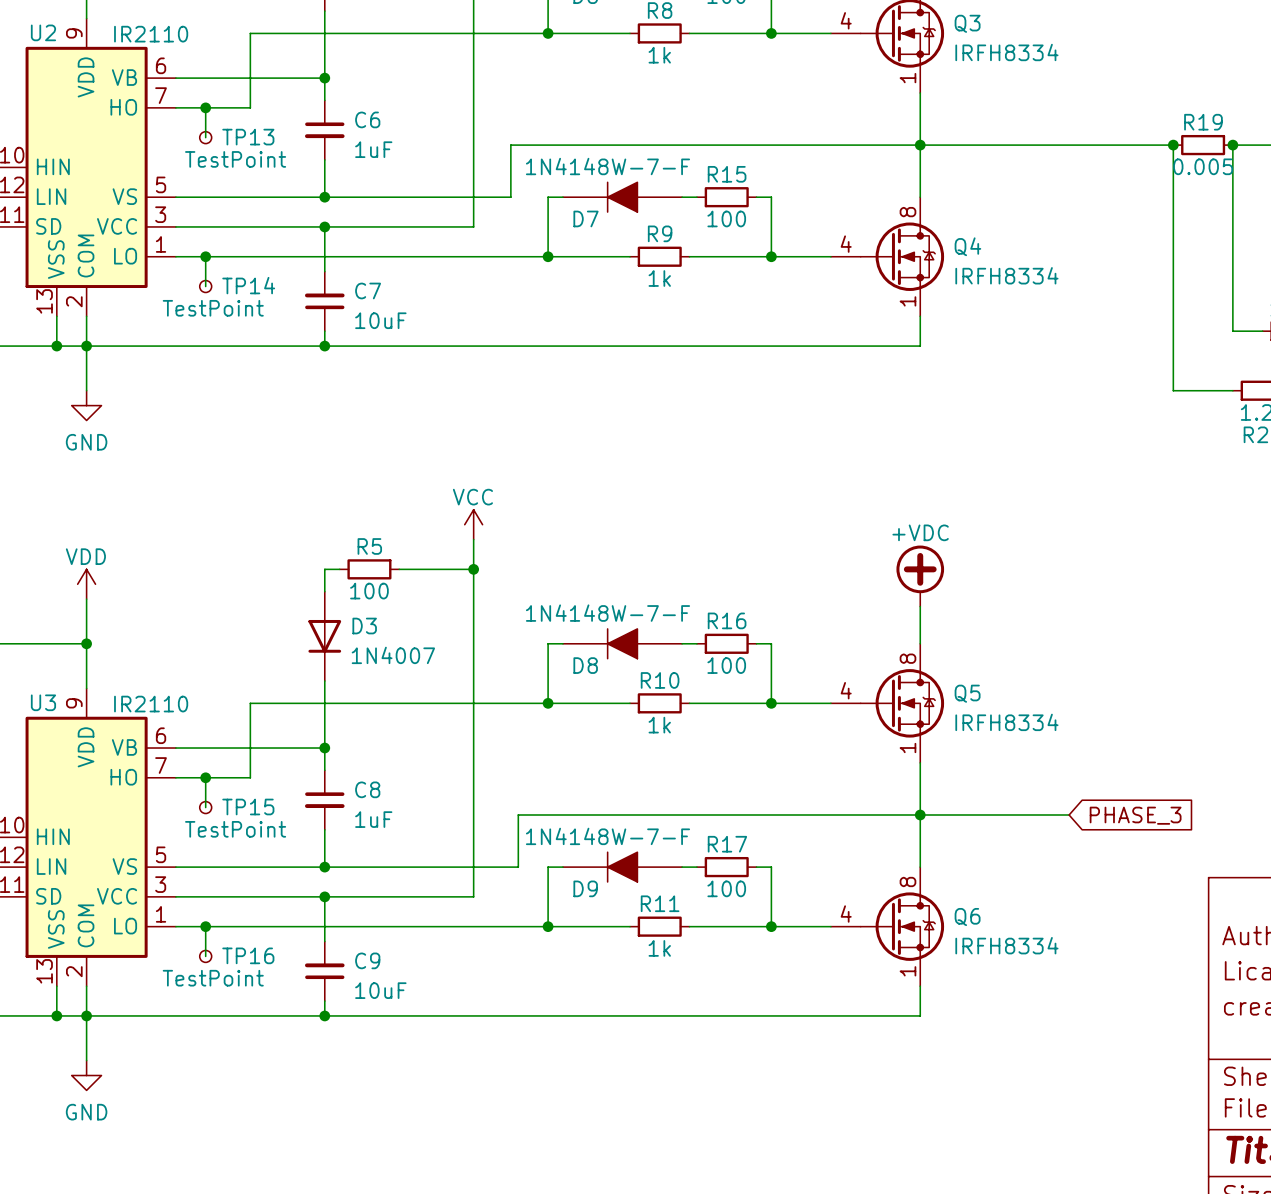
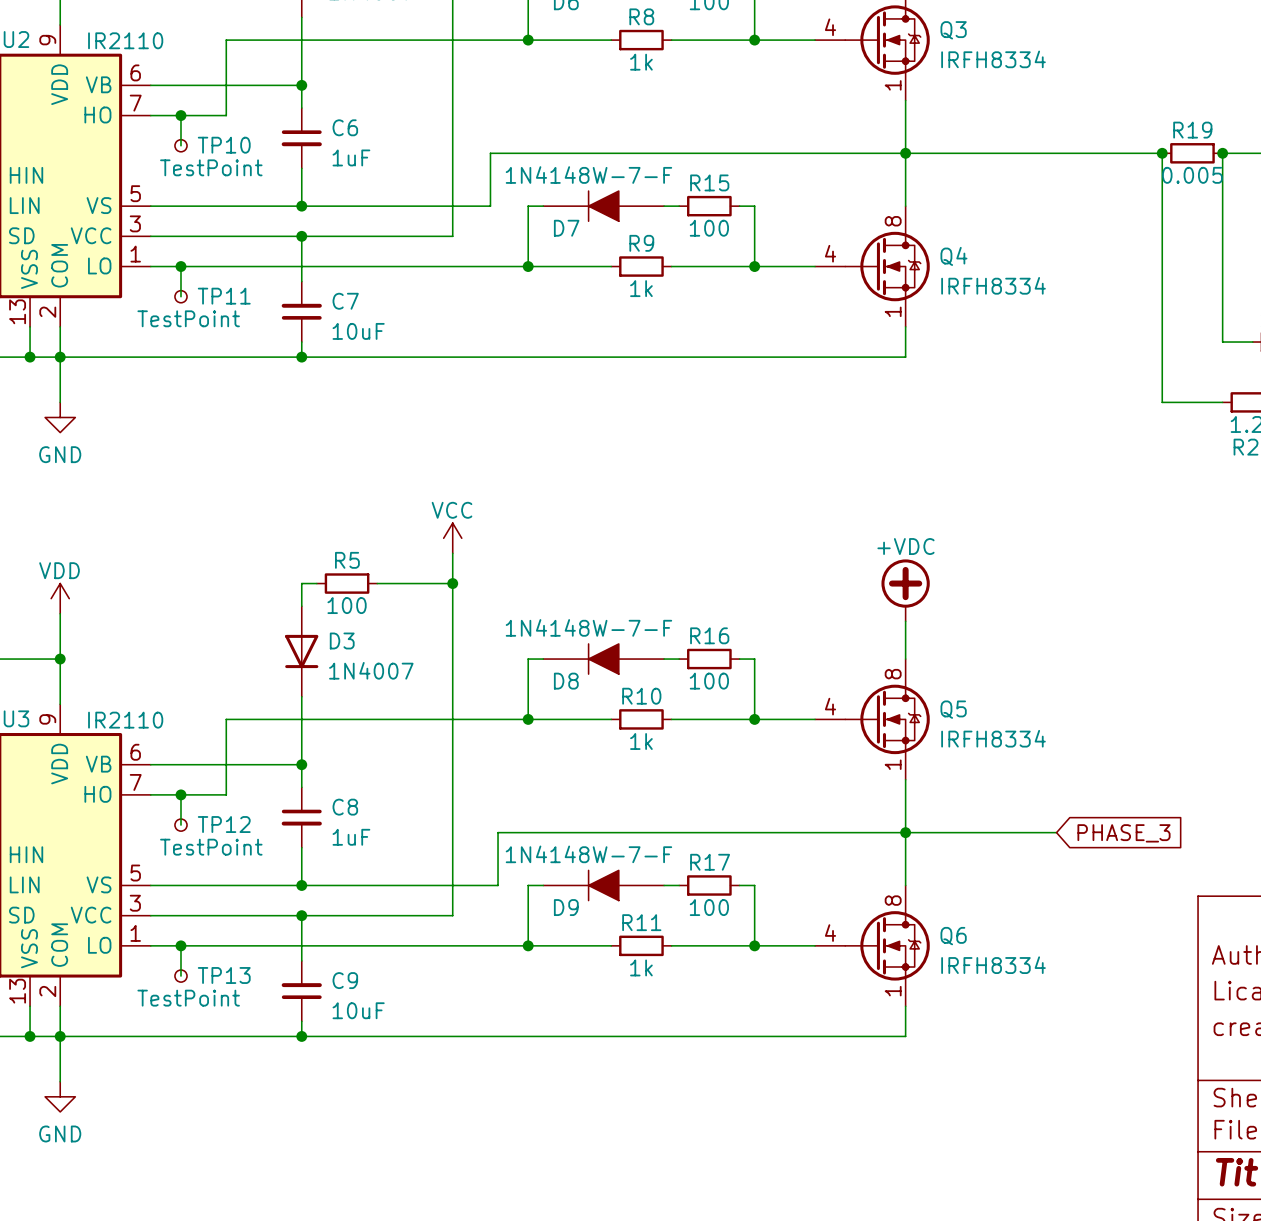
TP13 name: TP13 (248, 137) -> TP10 (224, 145)
TP14 name: TP14 (248, 285) -> TP11 (224, 296)
TP15 name: TP15 (248, 807) -> TP12 (224, 824)
TP16 name: TP16 (248, 955) -> TP13 (224, 975)

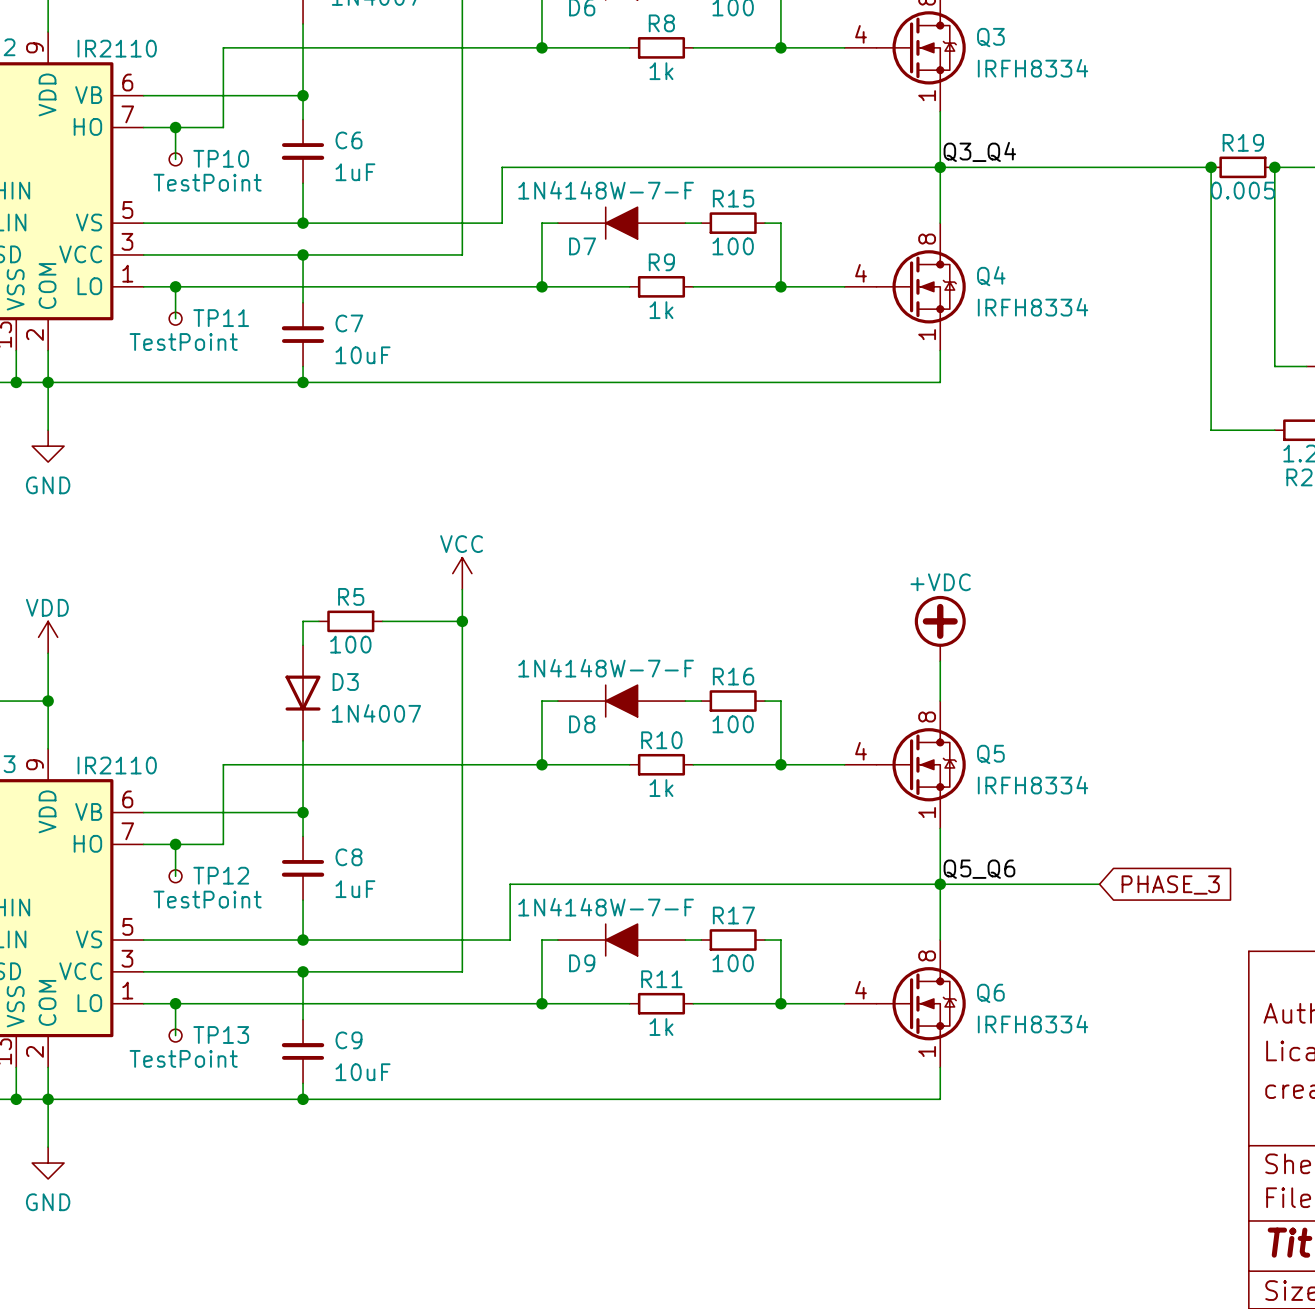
label: none -> Q3_Q4 (979, 151)
label: none -> Q5_Q6 (979, 869)

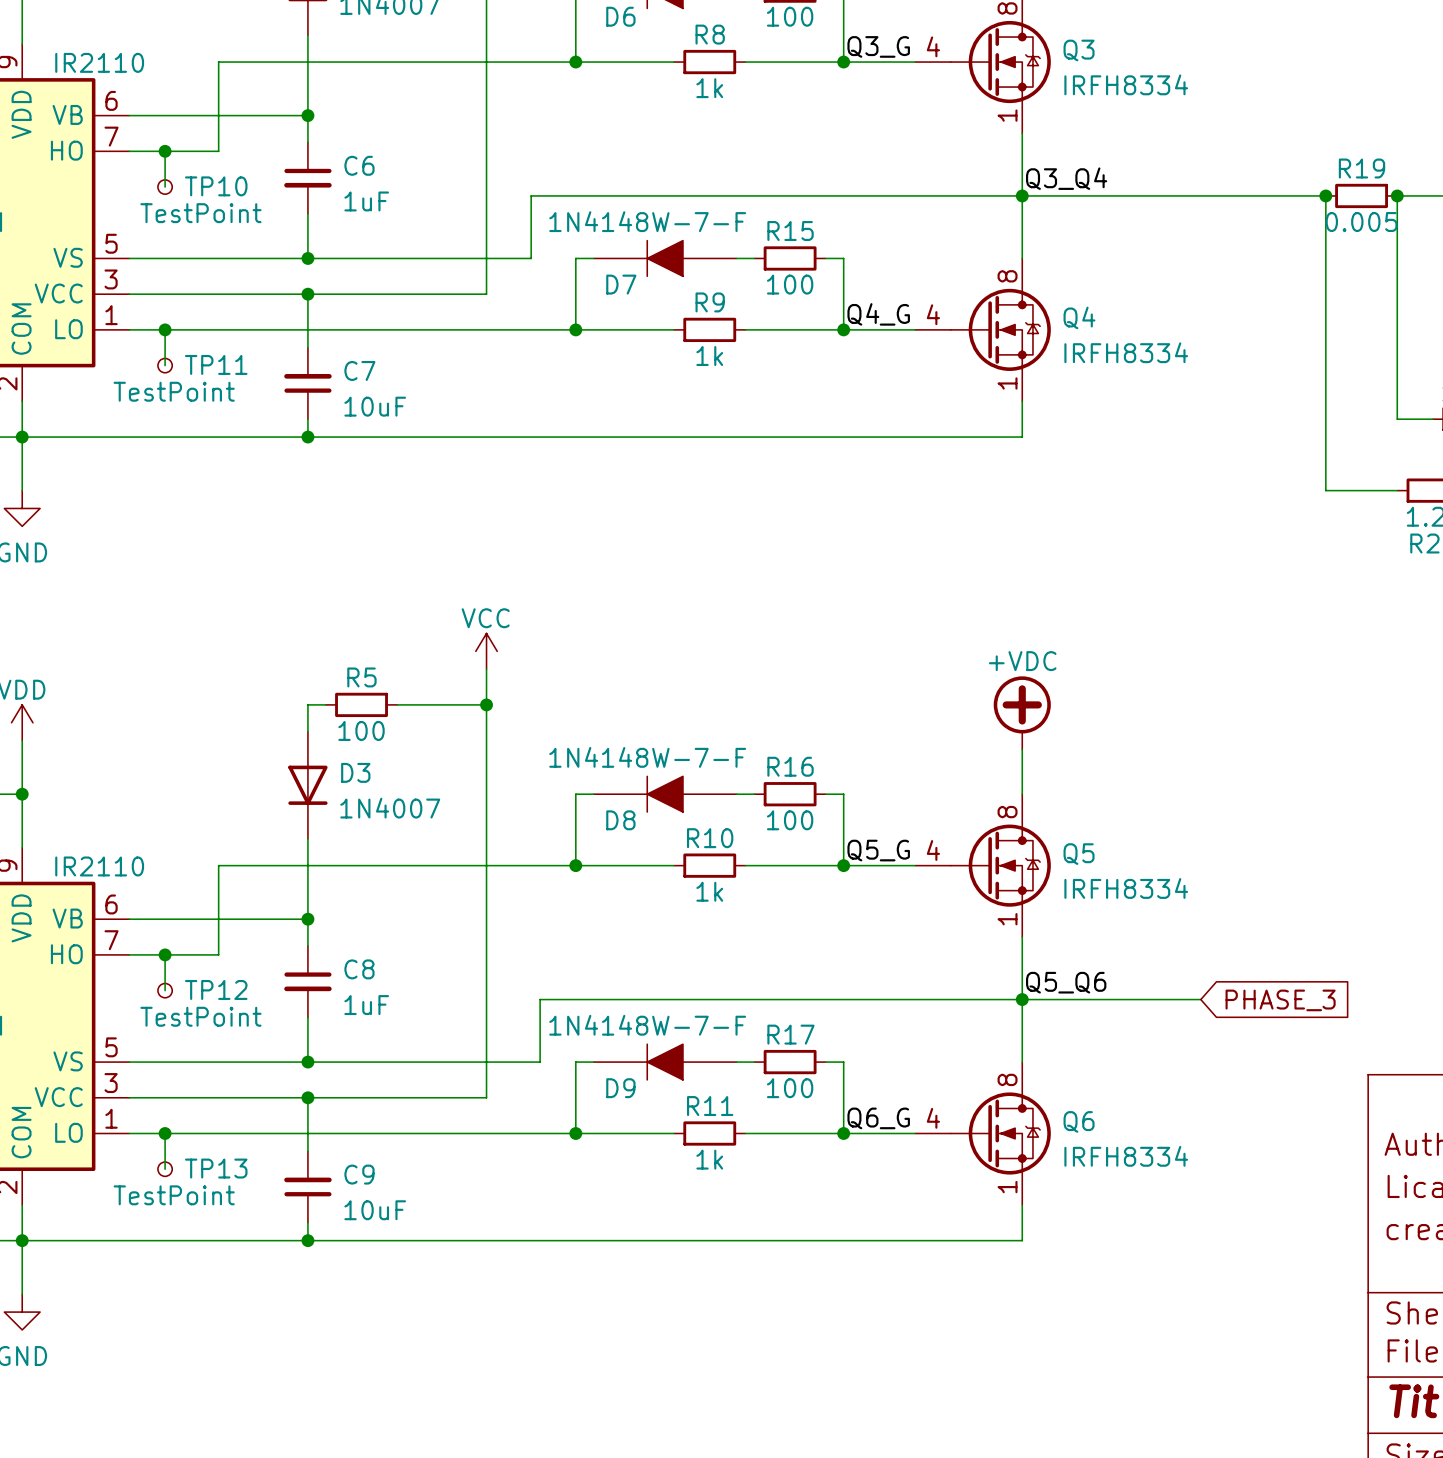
label: none -> Q3_G (878, 46)
label: none -> Q4_G (878, 314)
label: none -> Q5_G (878, 850)
label: none -> Q6_G (878, 1118)

